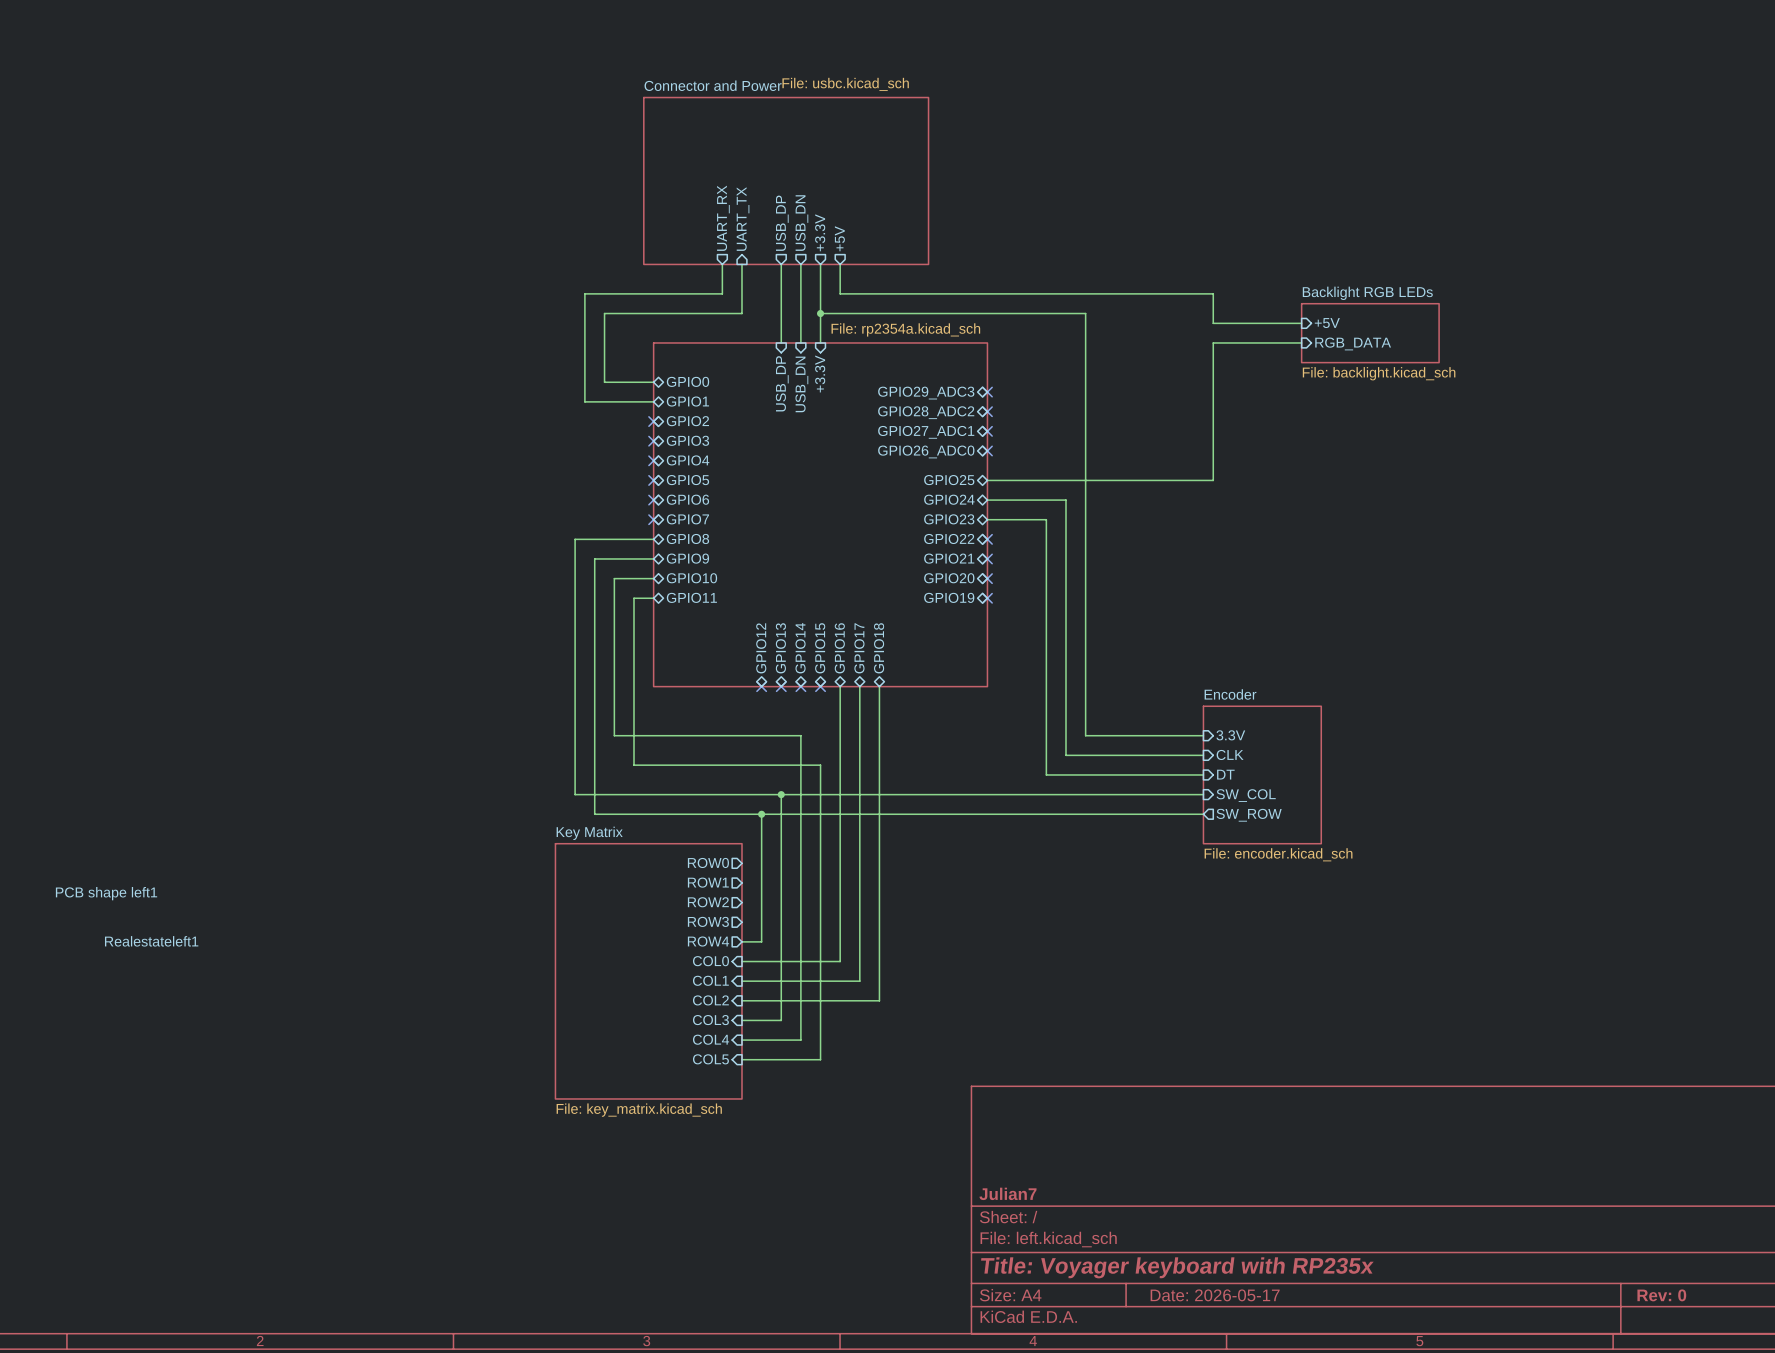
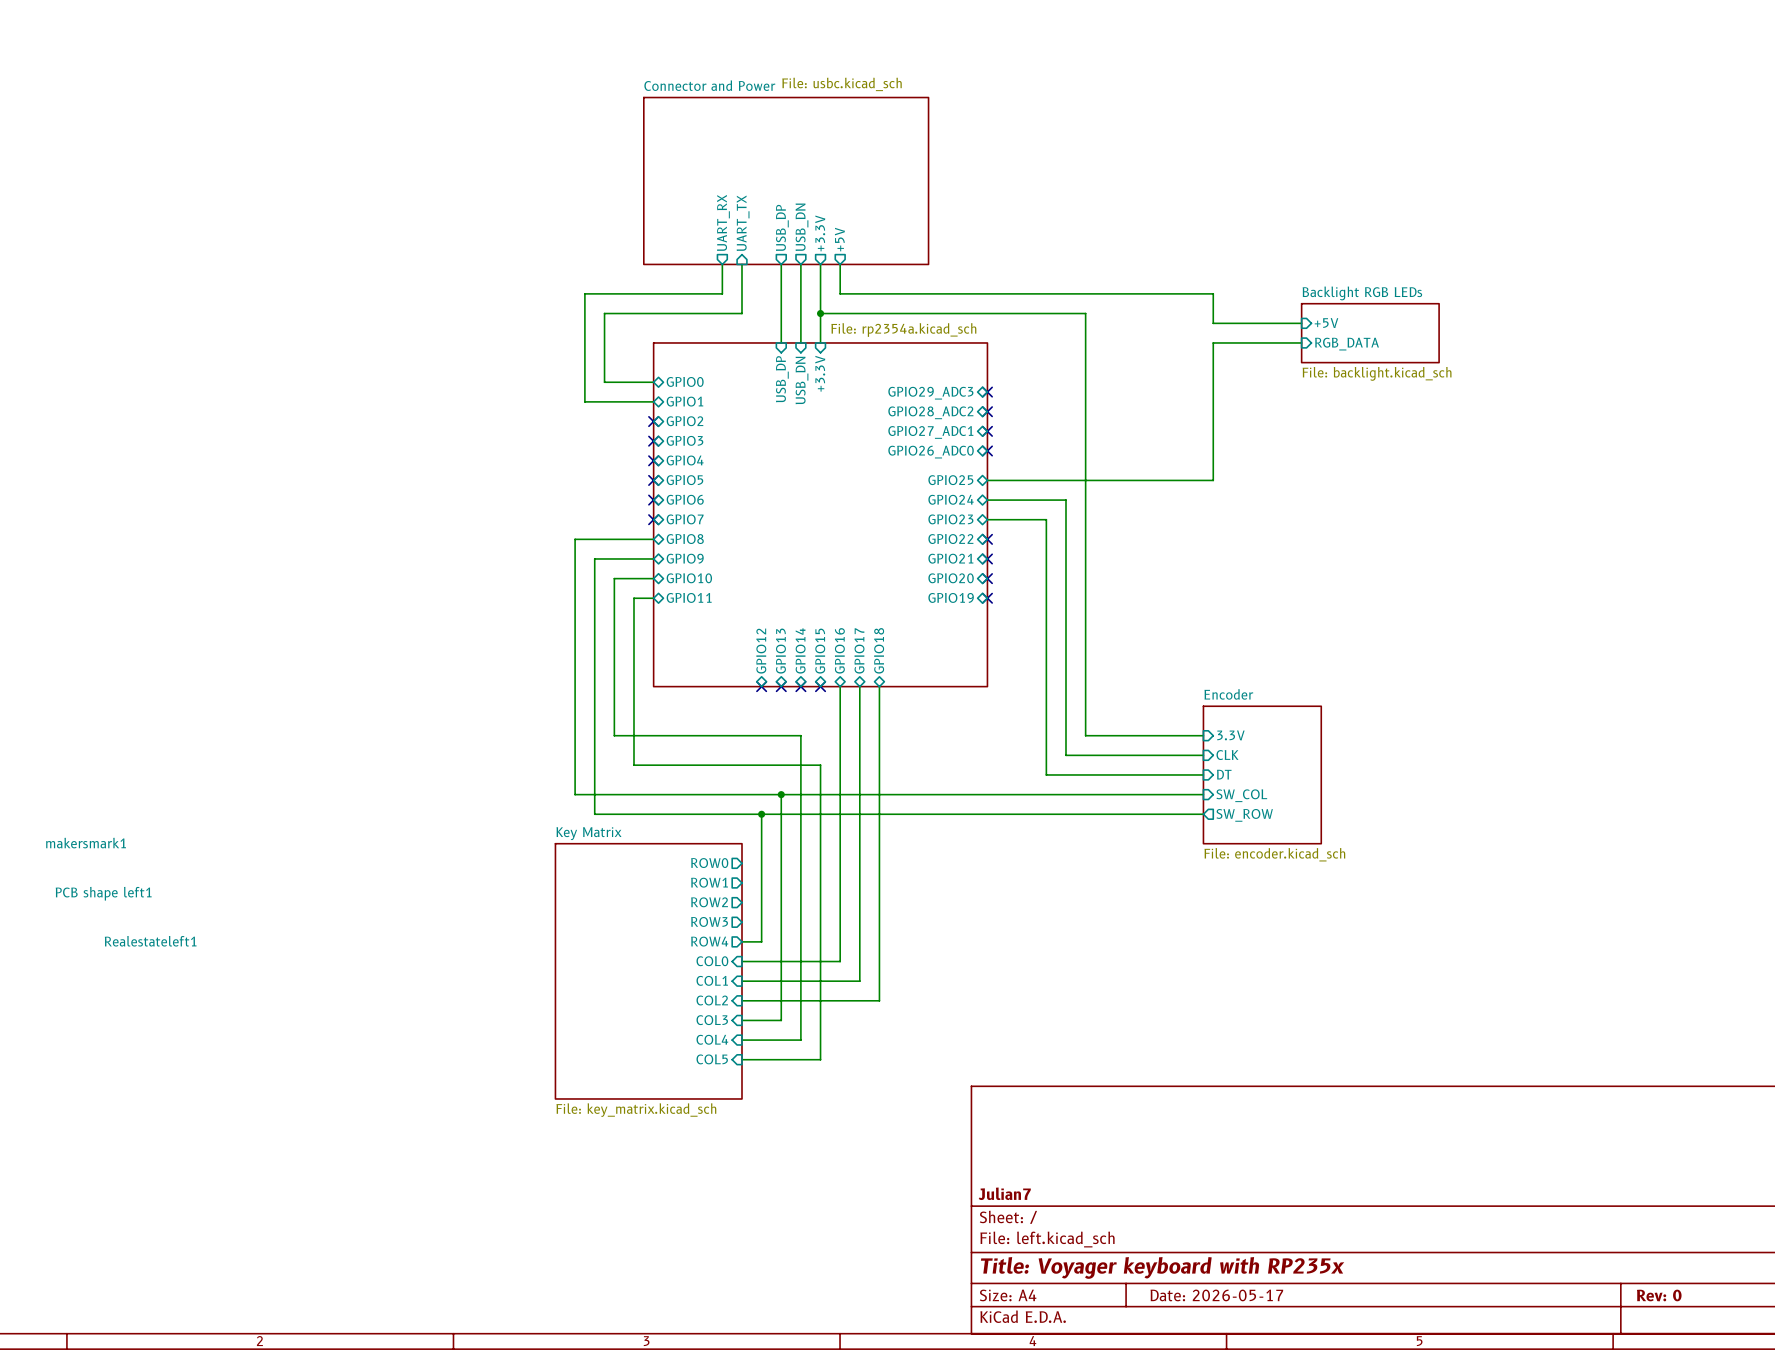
makersmark1: none -> (86, 843)

